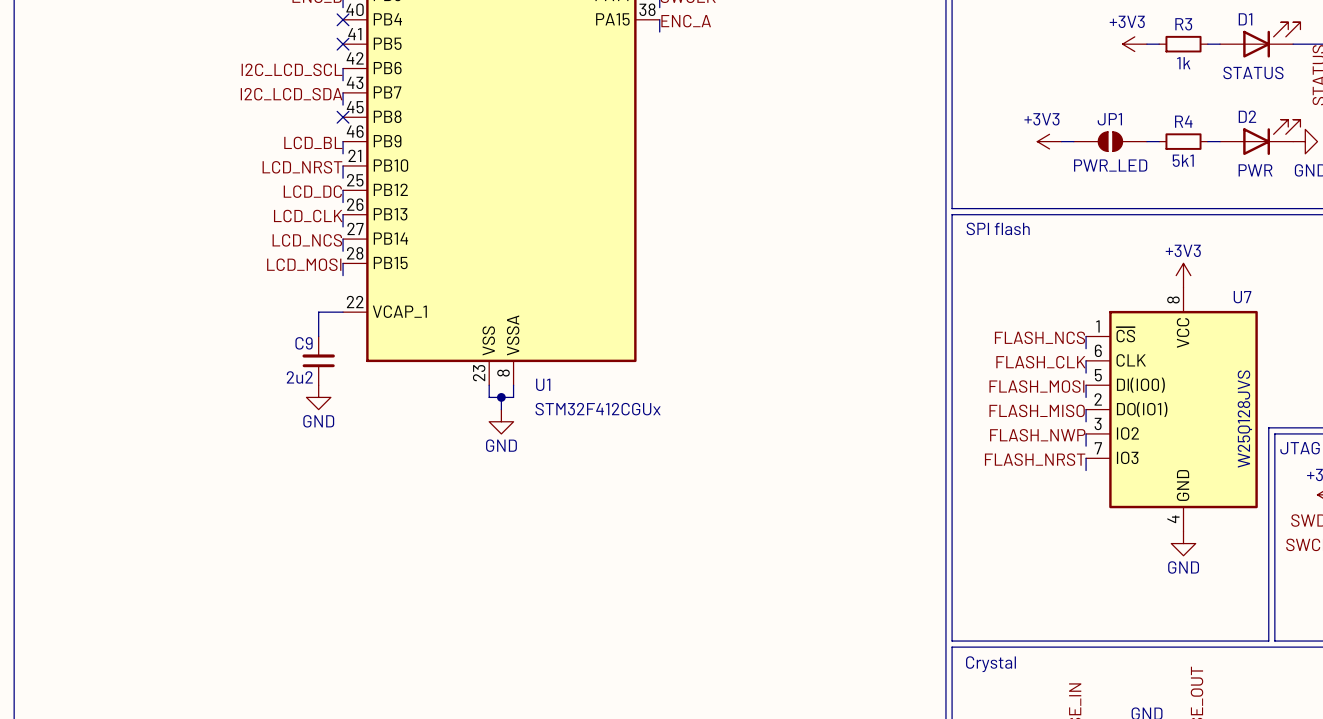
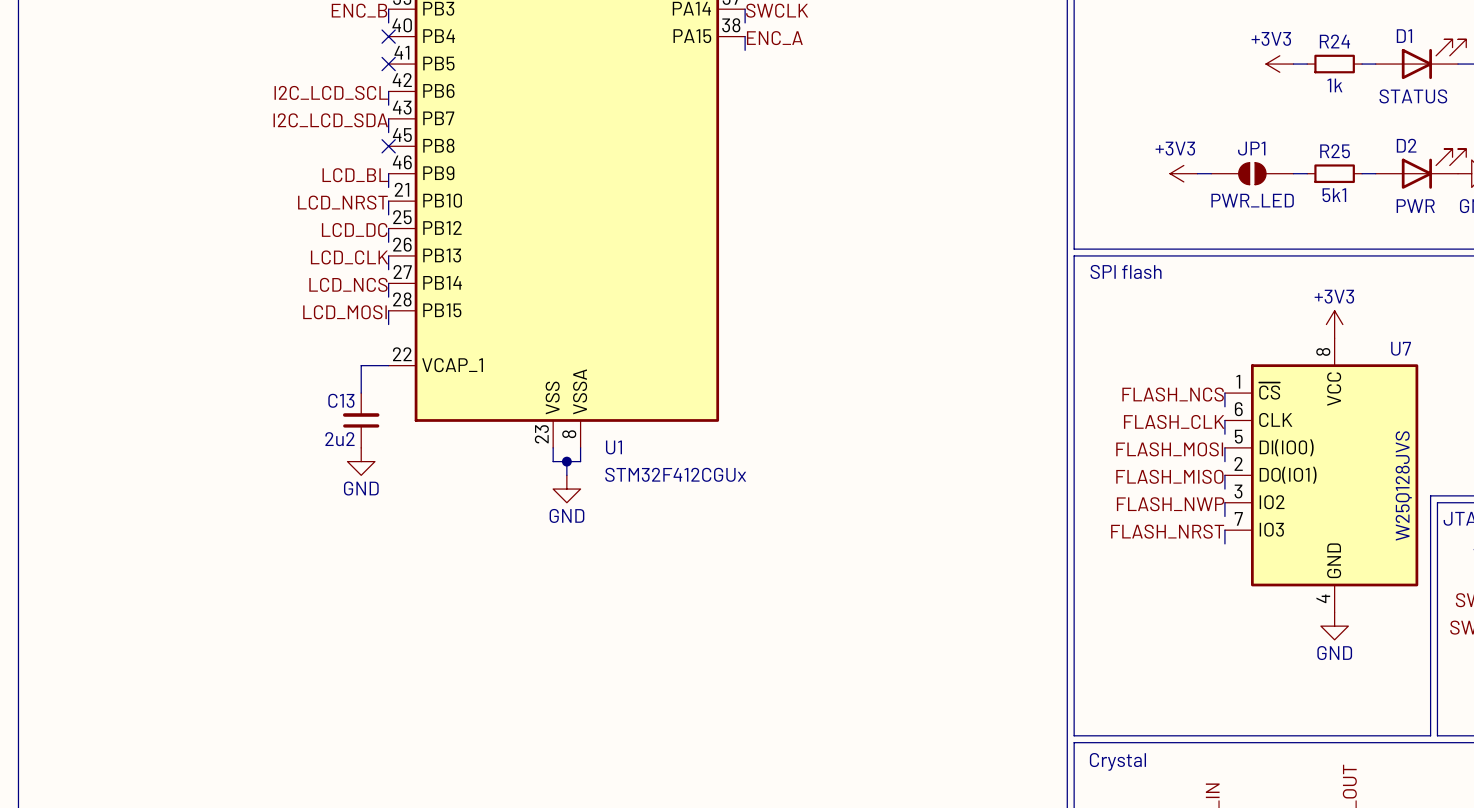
R3 name: R3 (1183, 24) -> R24 (1334, 41)
R4 name: R4 (1183, 121) -> R25 (1335, 151)
C9 name: C9 (304, 343) -> C13 (341, 400)

